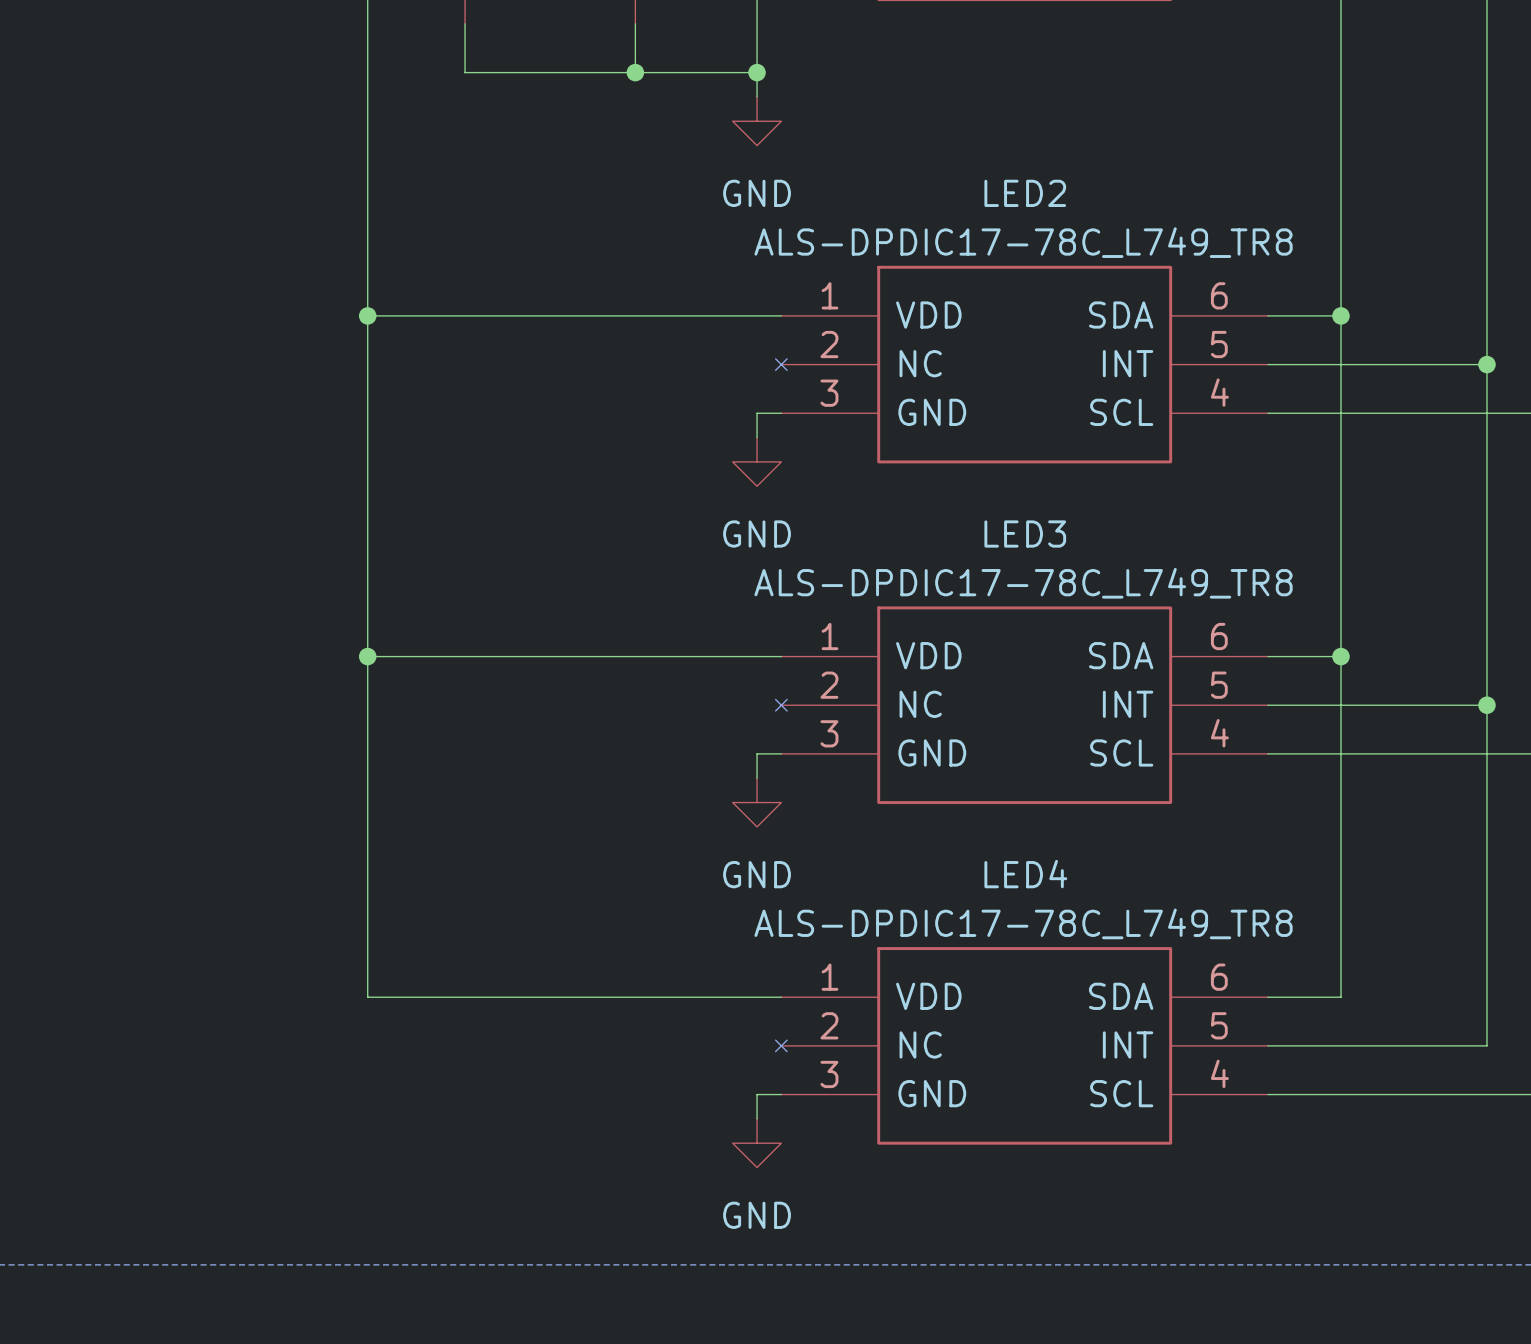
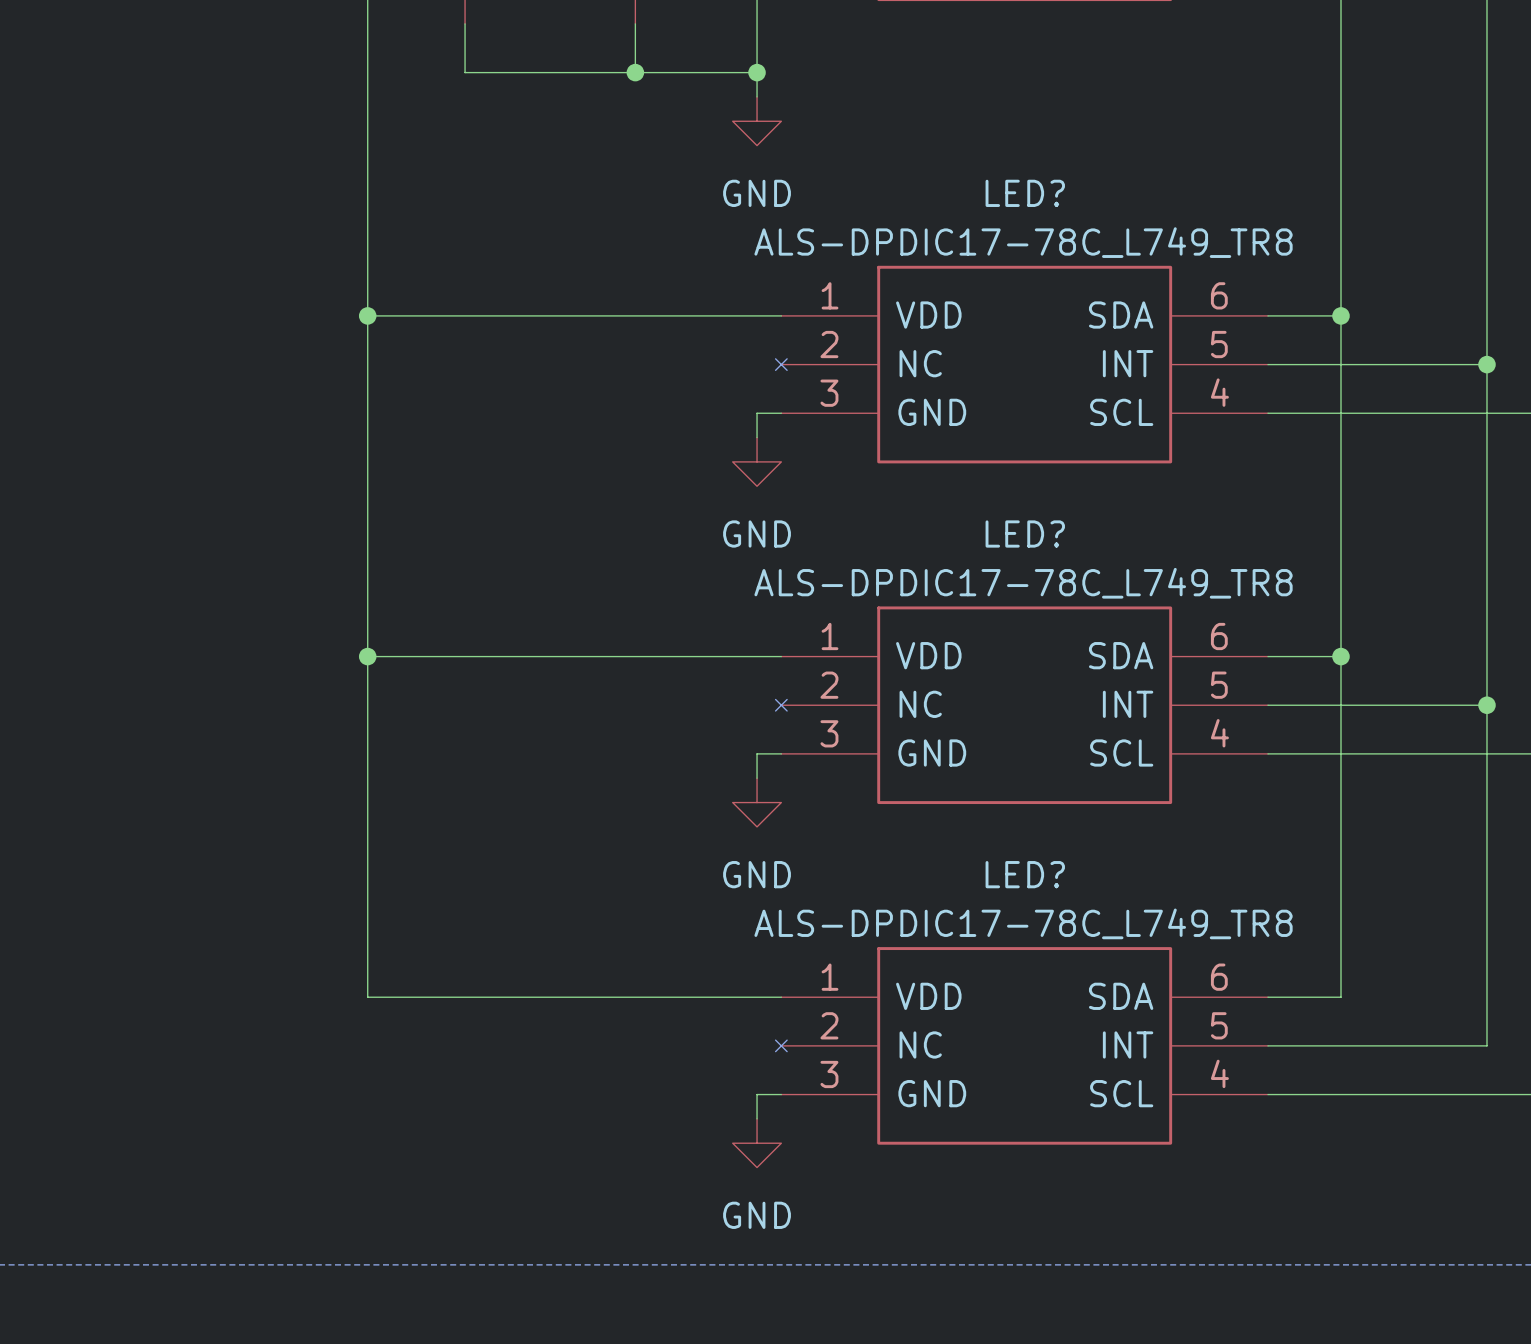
LED2 name: LED2 (1025, 193) -> LED? (1025, 193)
LED3 name: LED3 (1025, 534) -> LED? (1025, 534)
LED4 name: LED4 (1025, 874) -> LED? (1025, 874)

